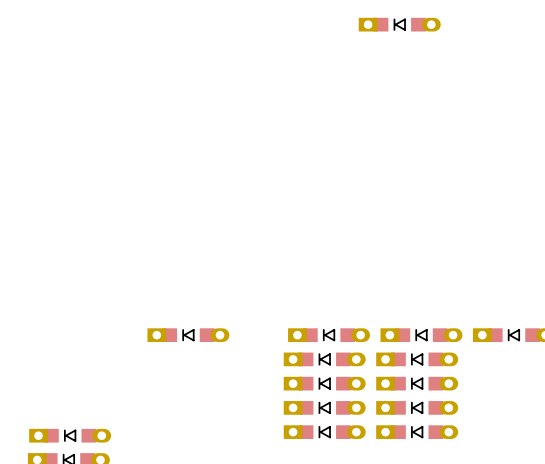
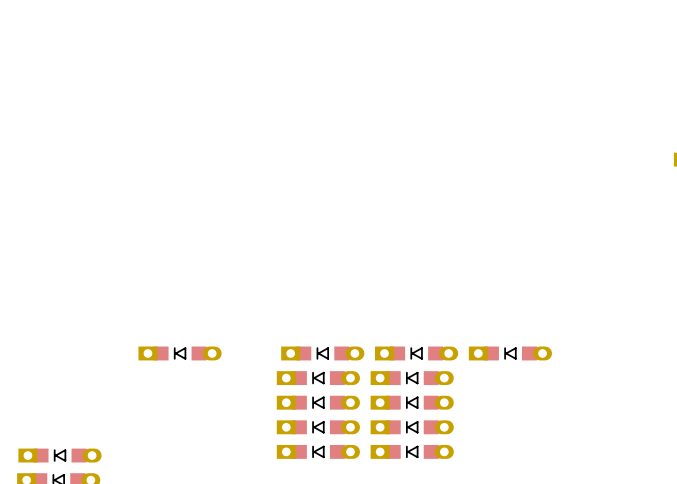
part: (399, 24) -> none

